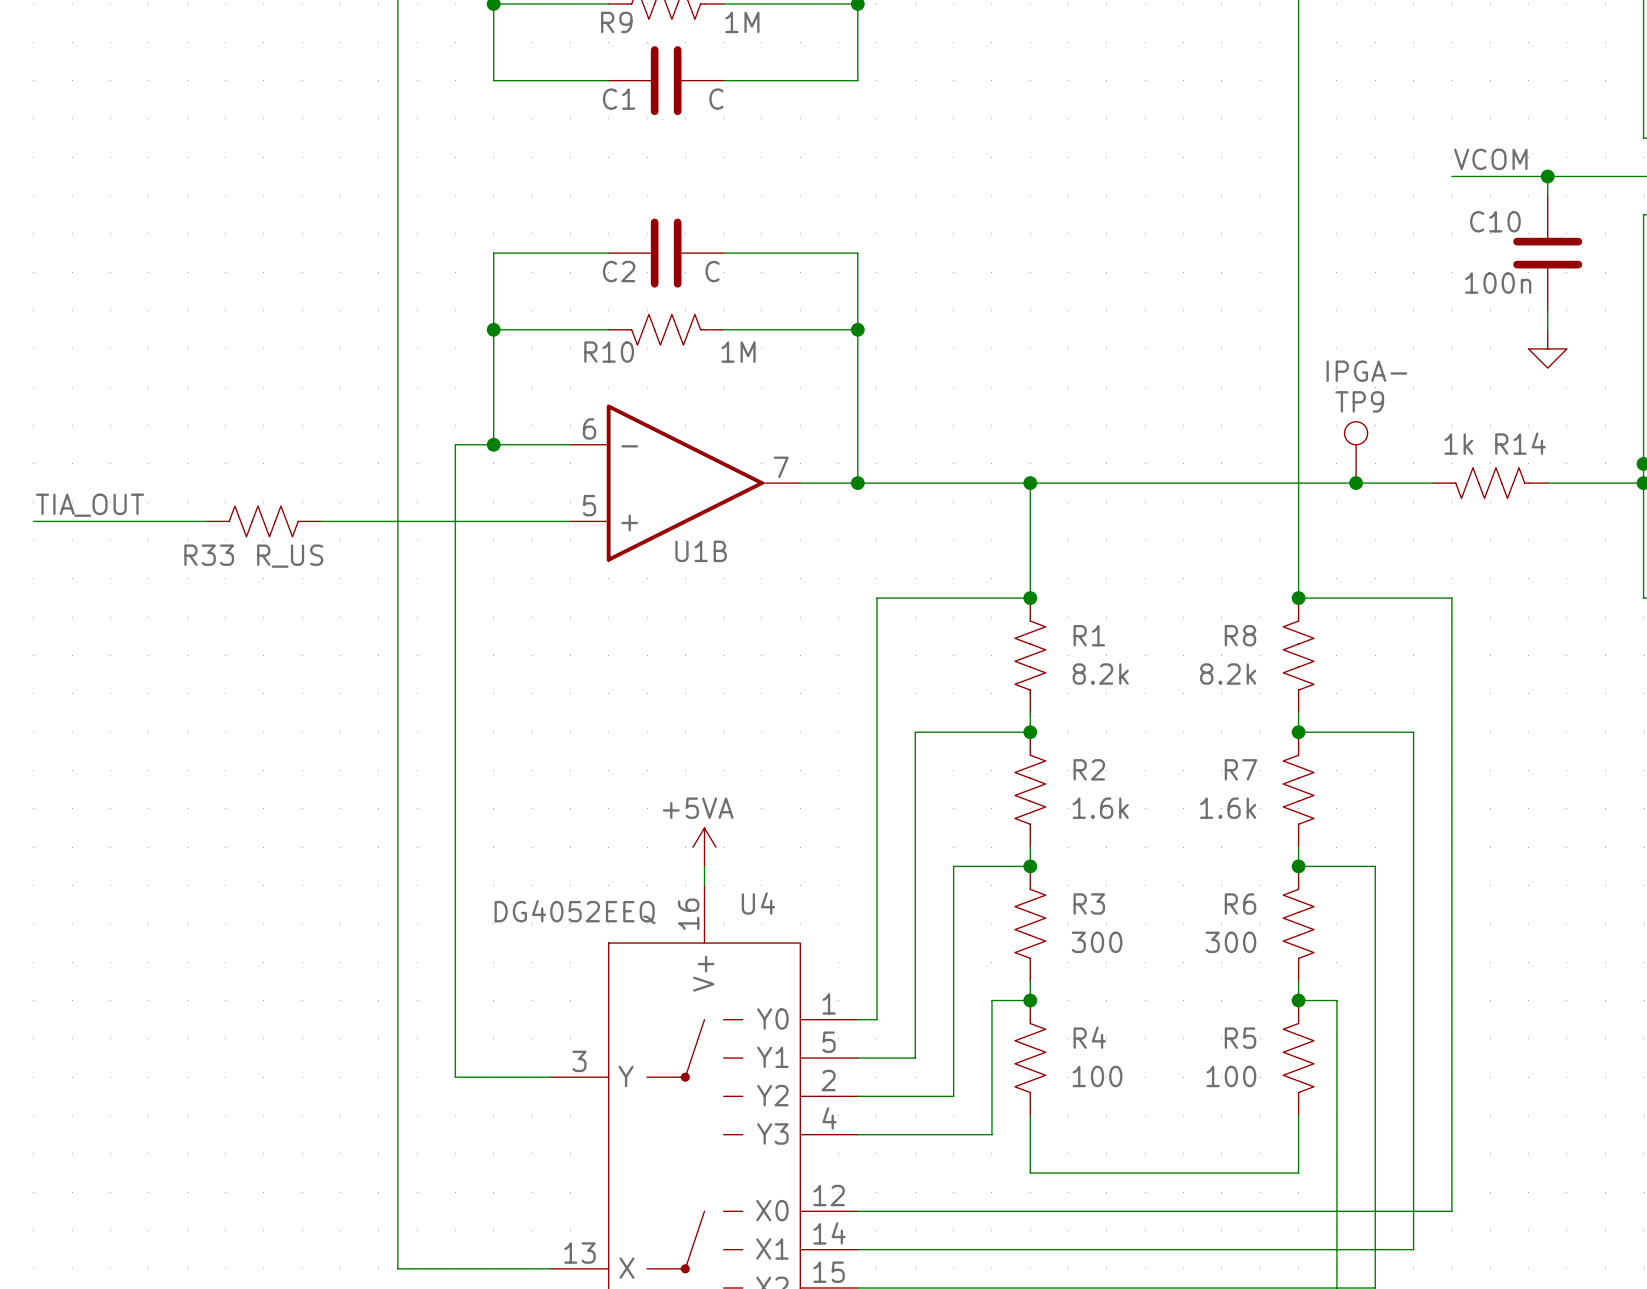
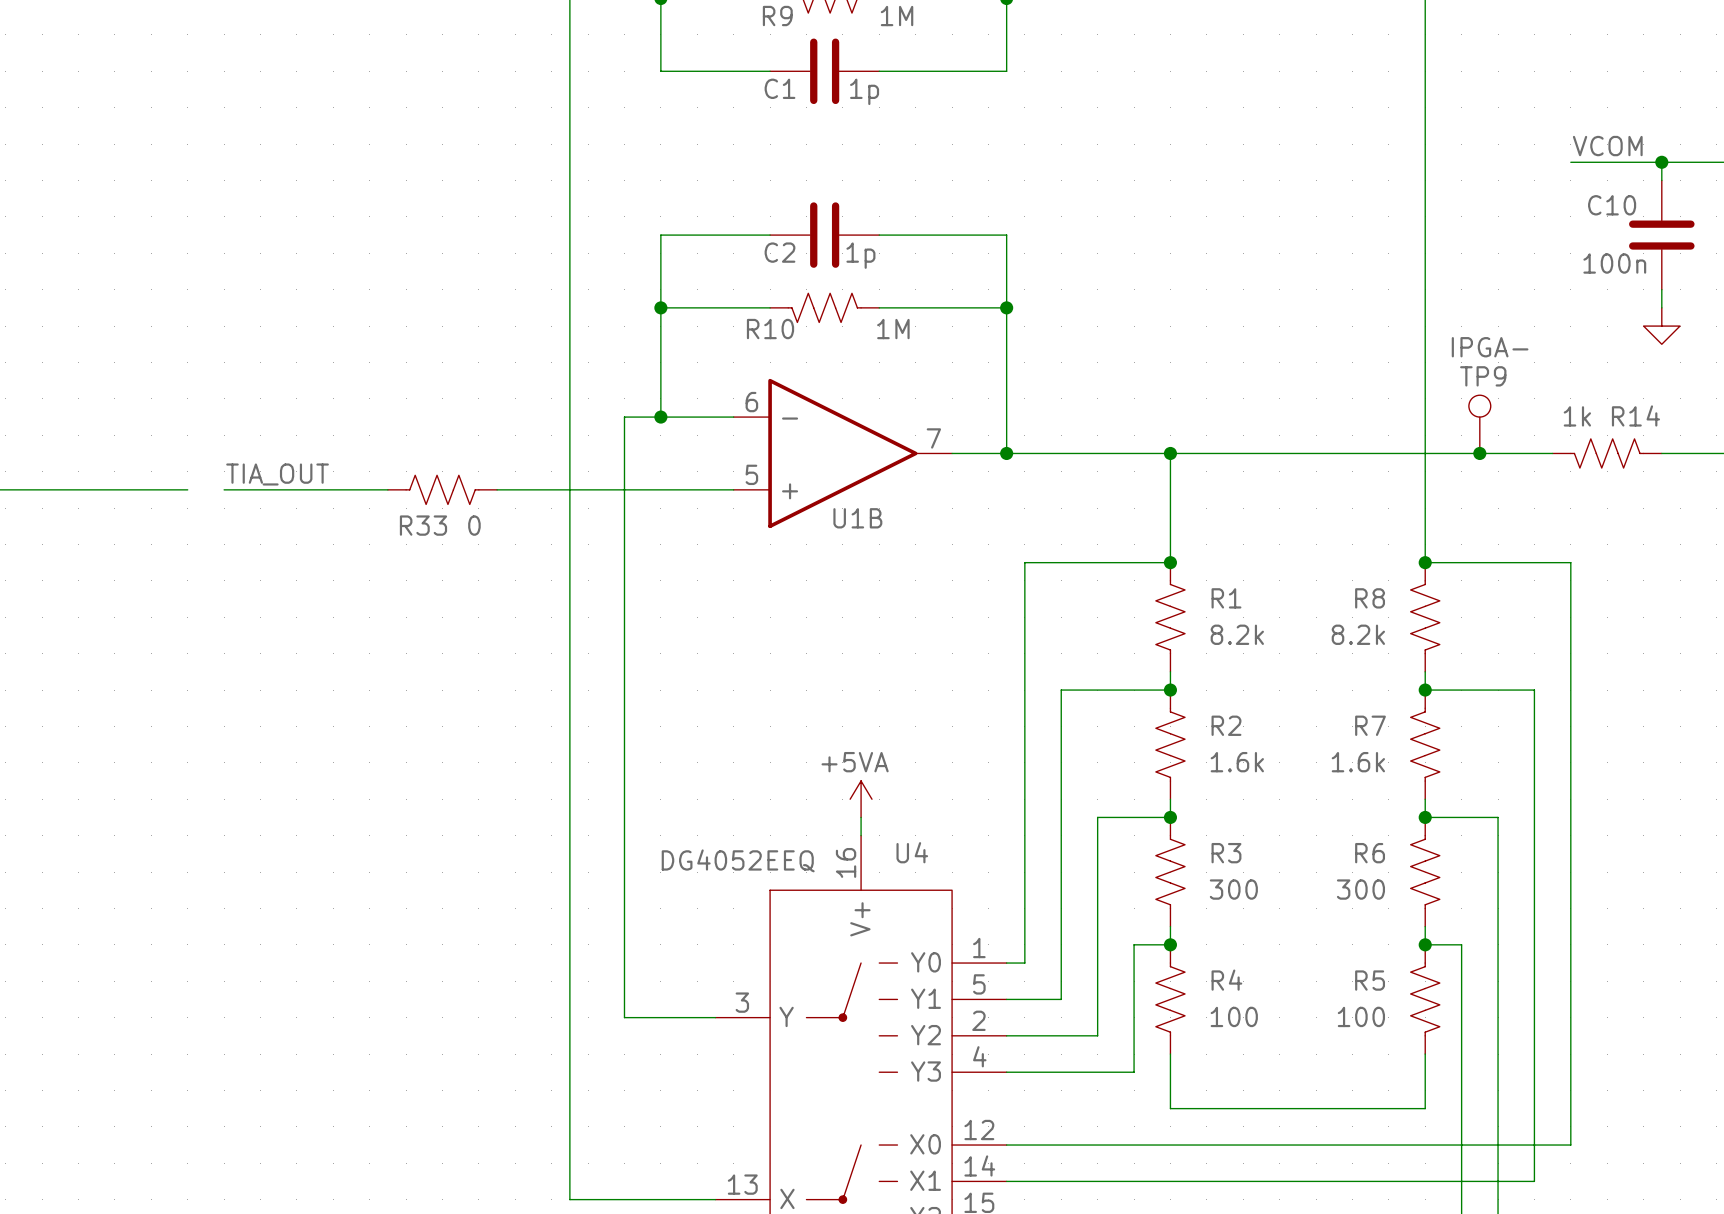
C1 value: C (716, 99) -> 1p (864, 91)
C2 value: C (712, 271) -> 1p (860, 255)
R33 name position: R33 (209, 555) -> R33 (423, 525)
R33 value: R_US (290, 556) -> 0 (474, 525)

